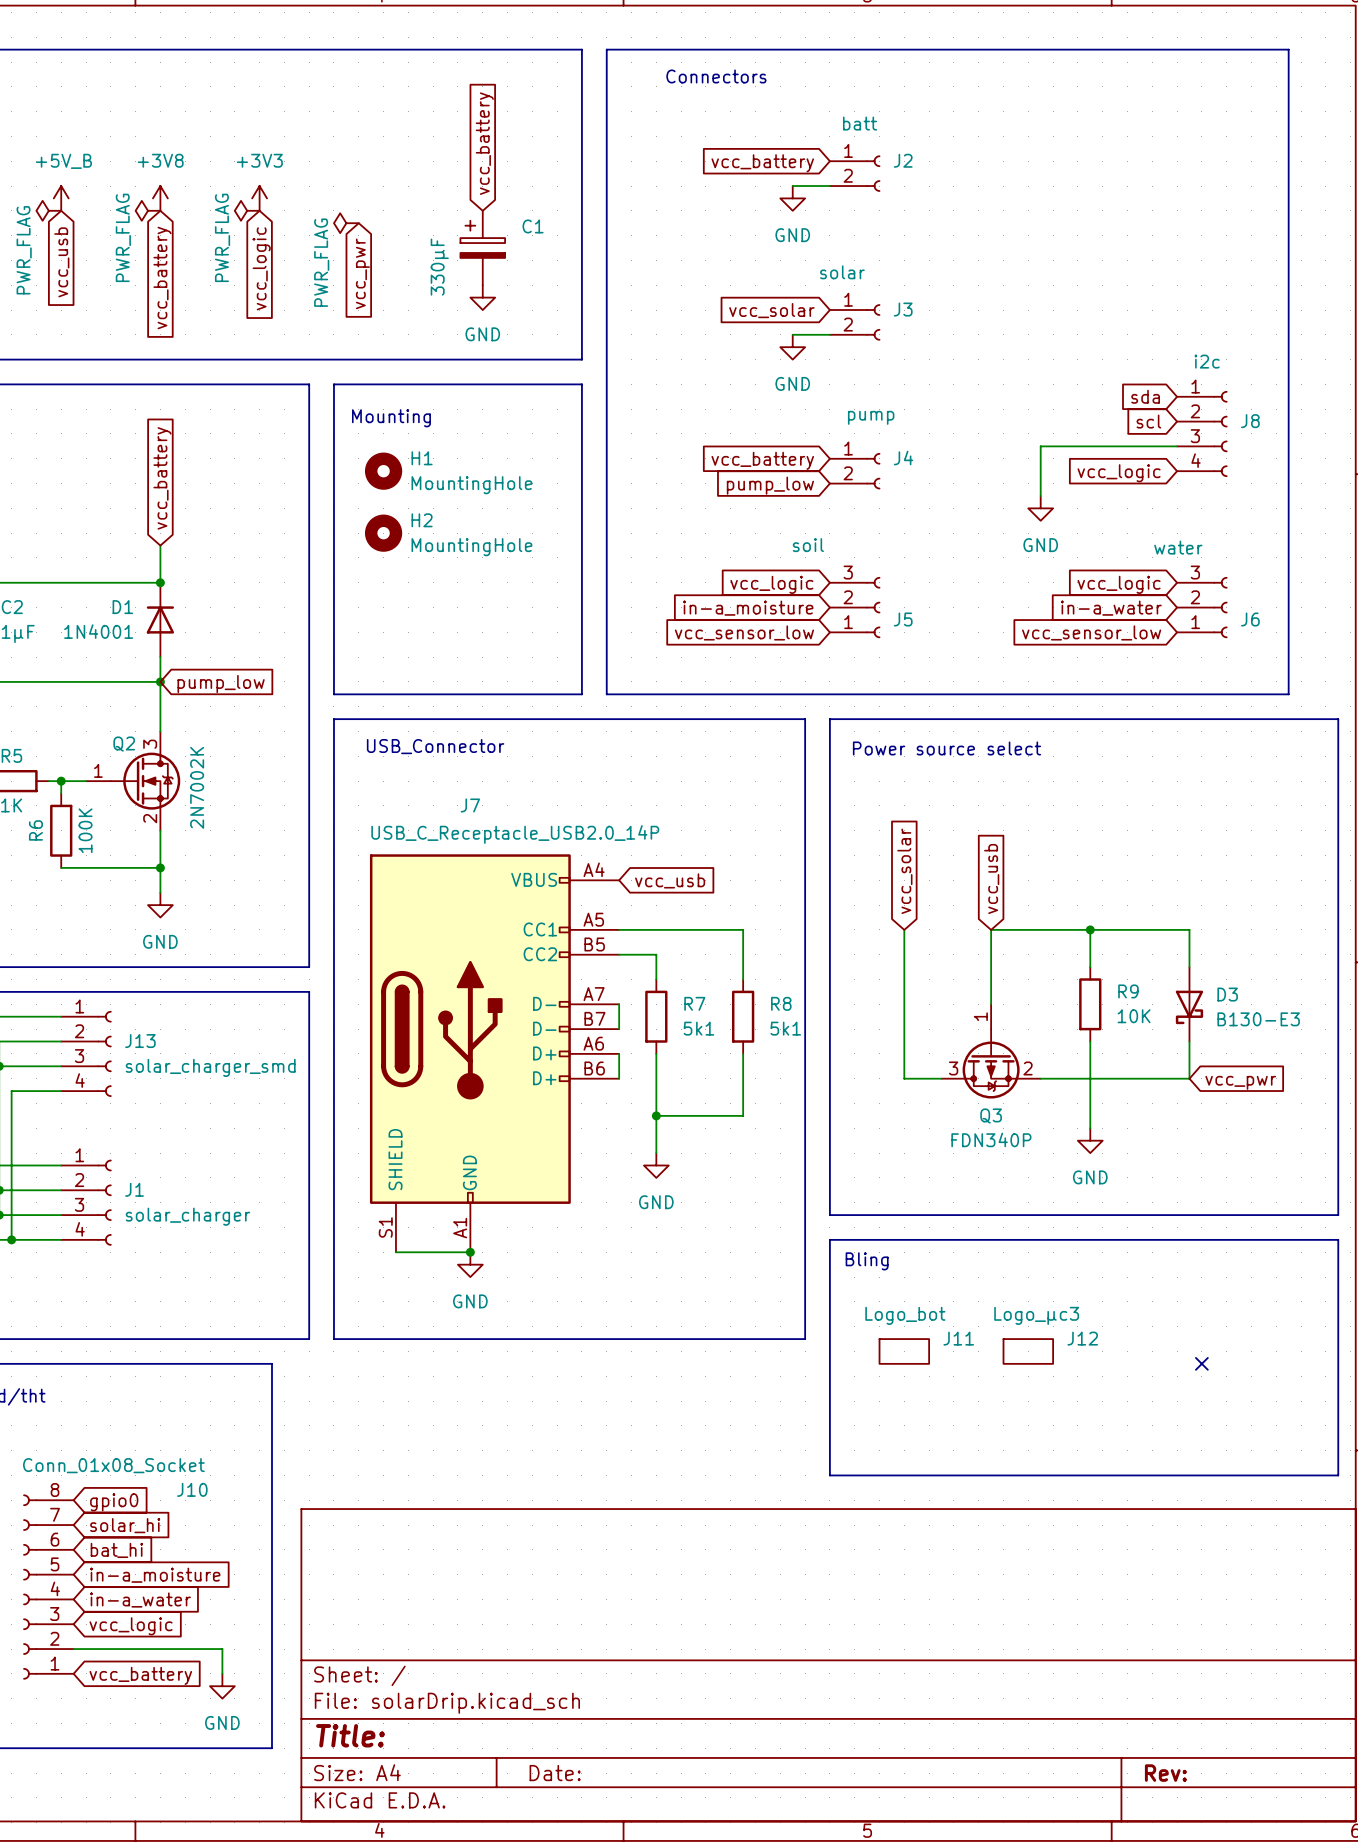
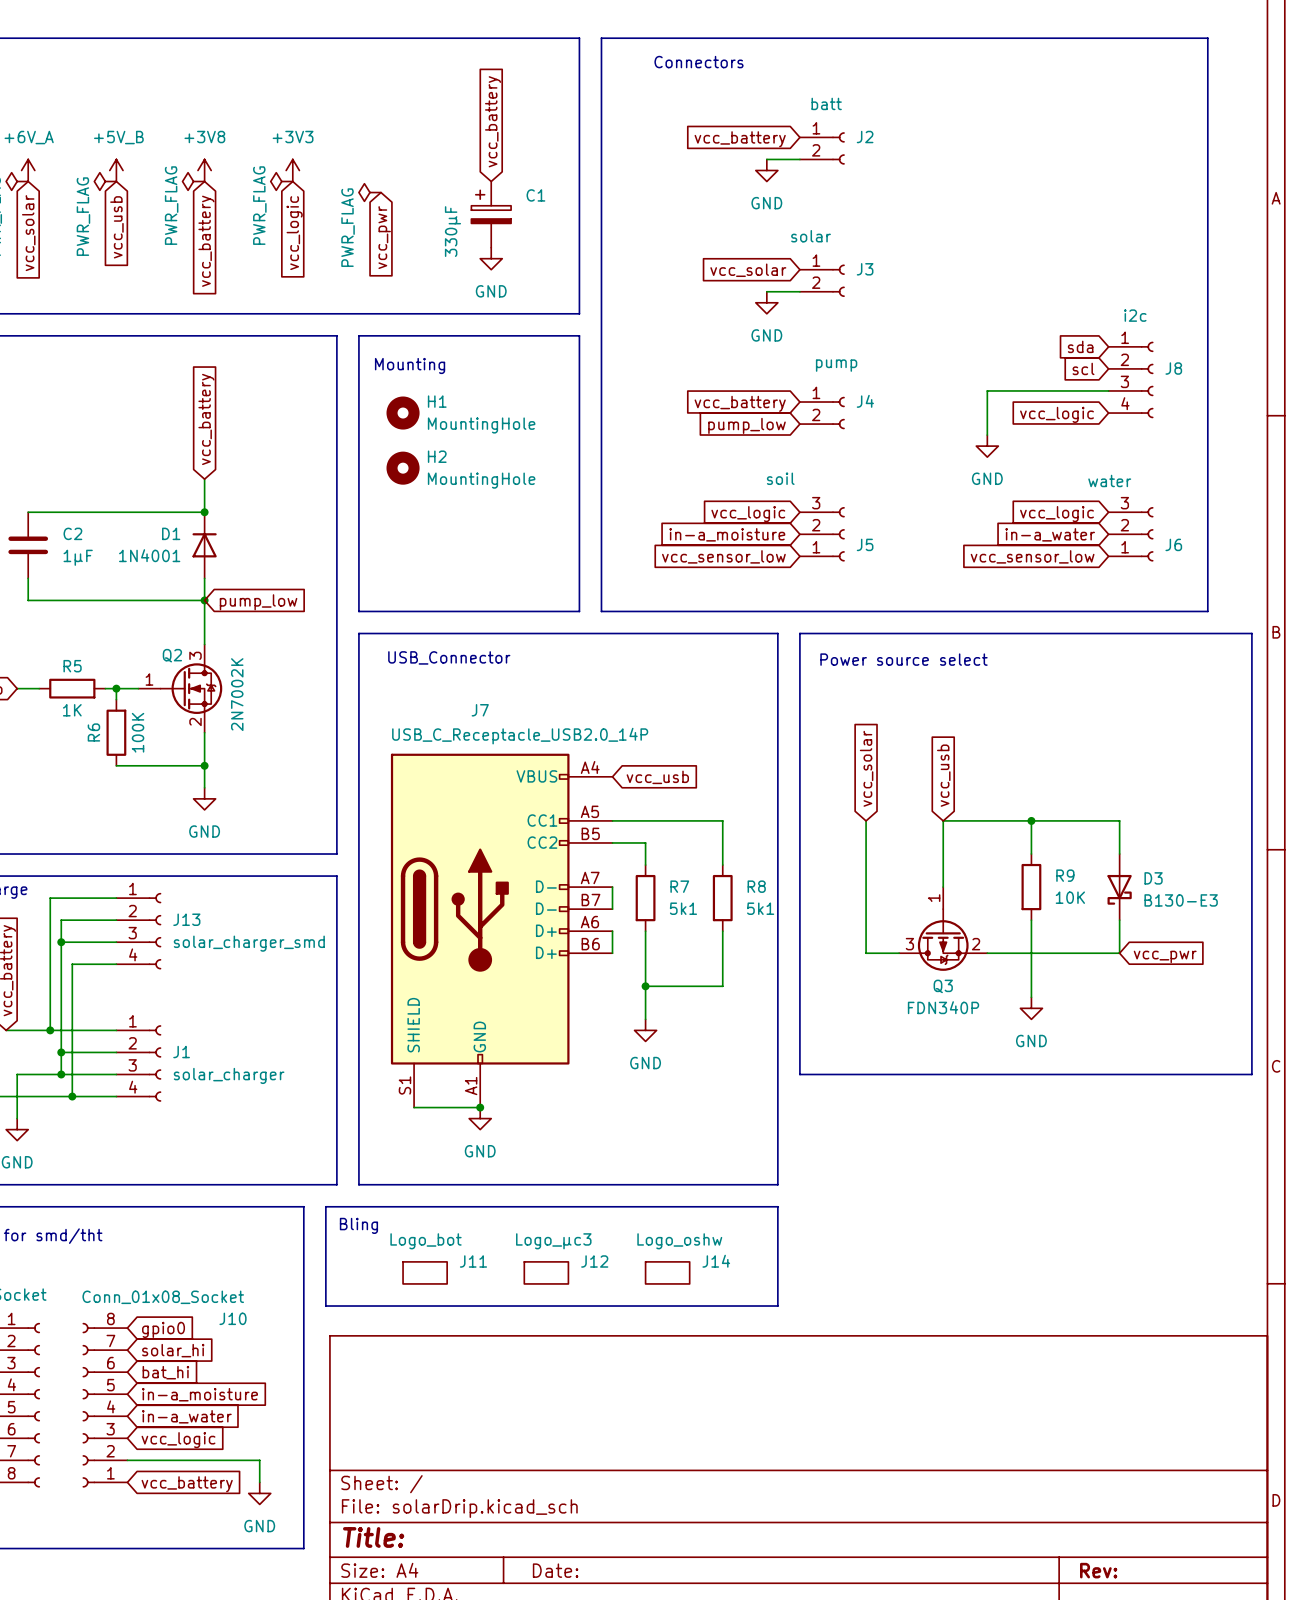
line: (829, 1239) (1338, 1239) (1338, 1475) (829, 1475) (829, 1239) -> none
text: Bling (867, 1261) -> none
J11 position: (904, 1351) -> (425, 1272)
J12 position: (1028, 1351) -> (546, 1272)
line: none -> (325, 1206) (777, 1206) (777, 1306) (325, 1306) (325, 1206)
no-connect mark: (1201, 1363) -> none
text: none -> Bling (358, 1225)
J14: none -> Logo_oshw (667, 1272)

